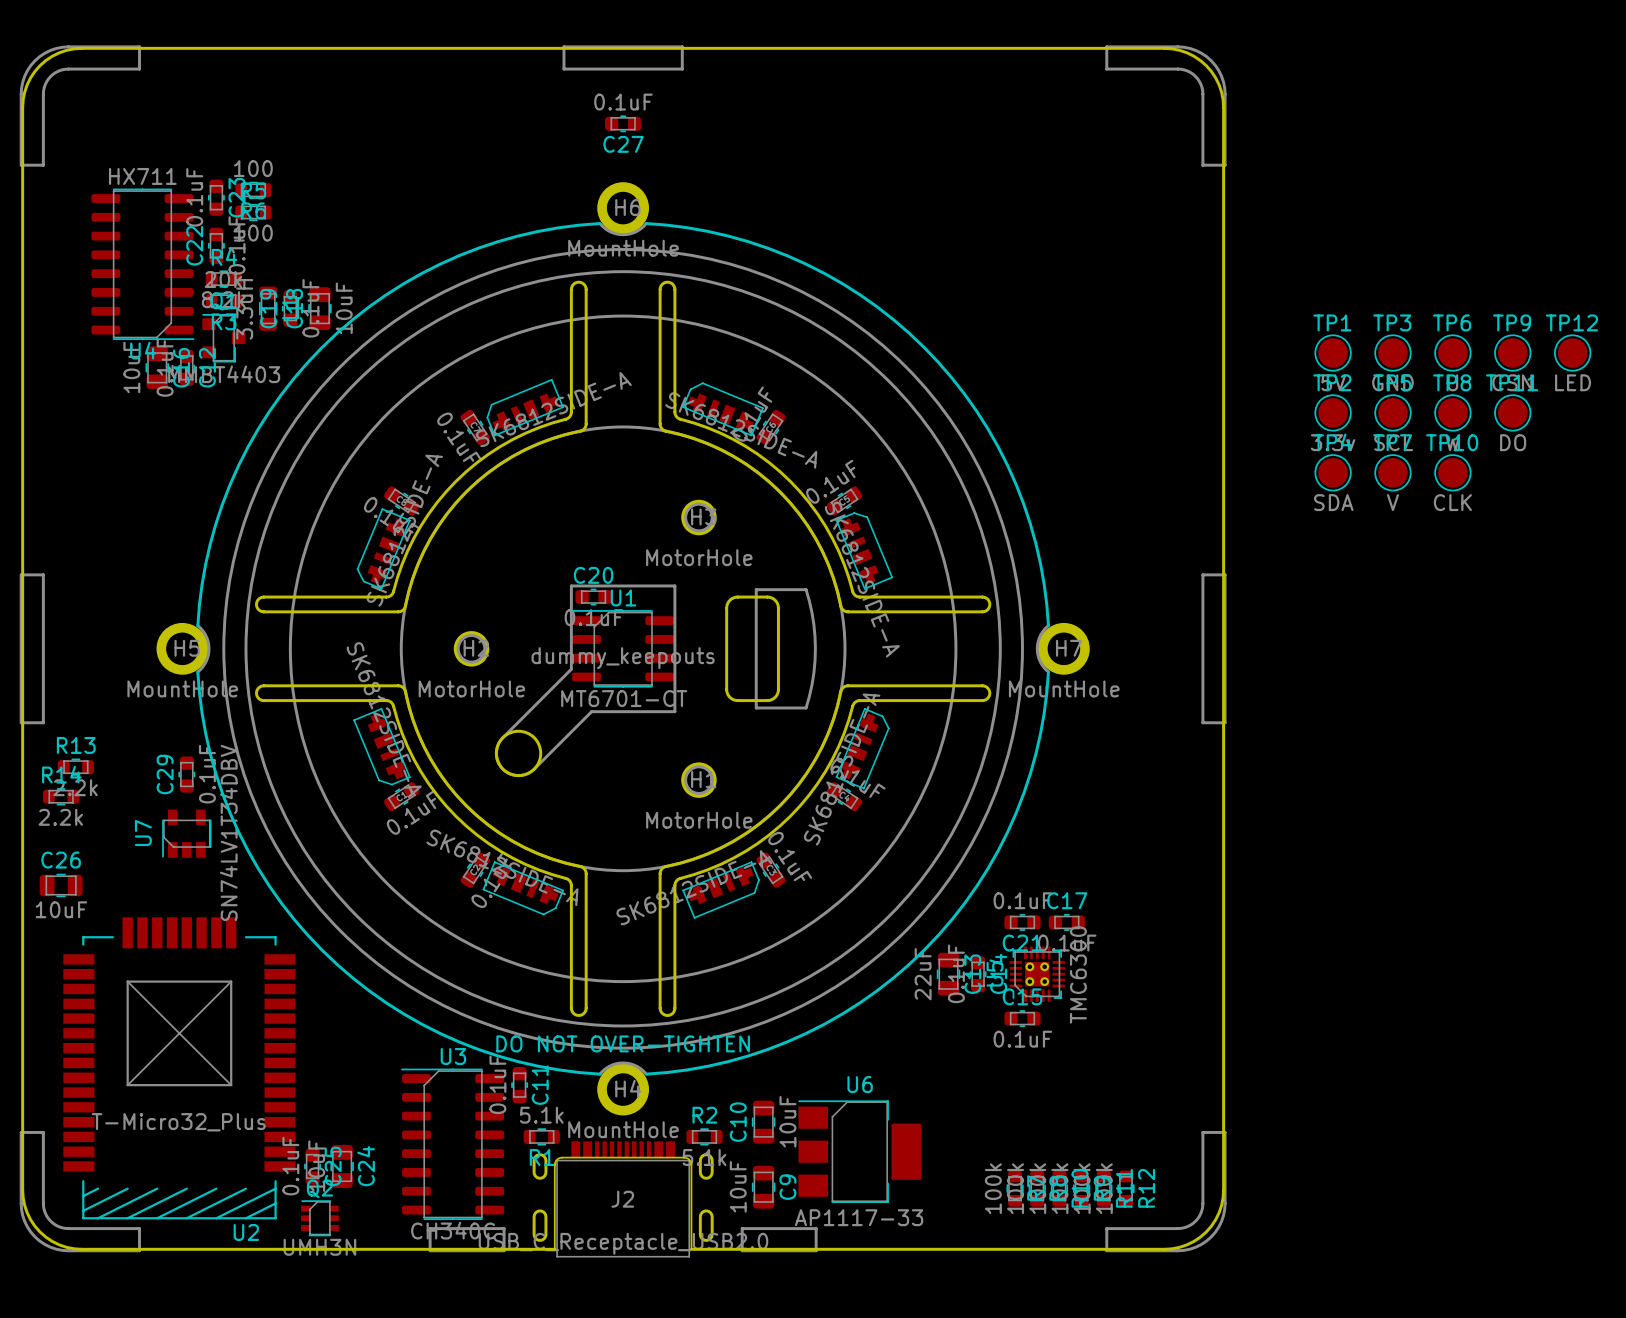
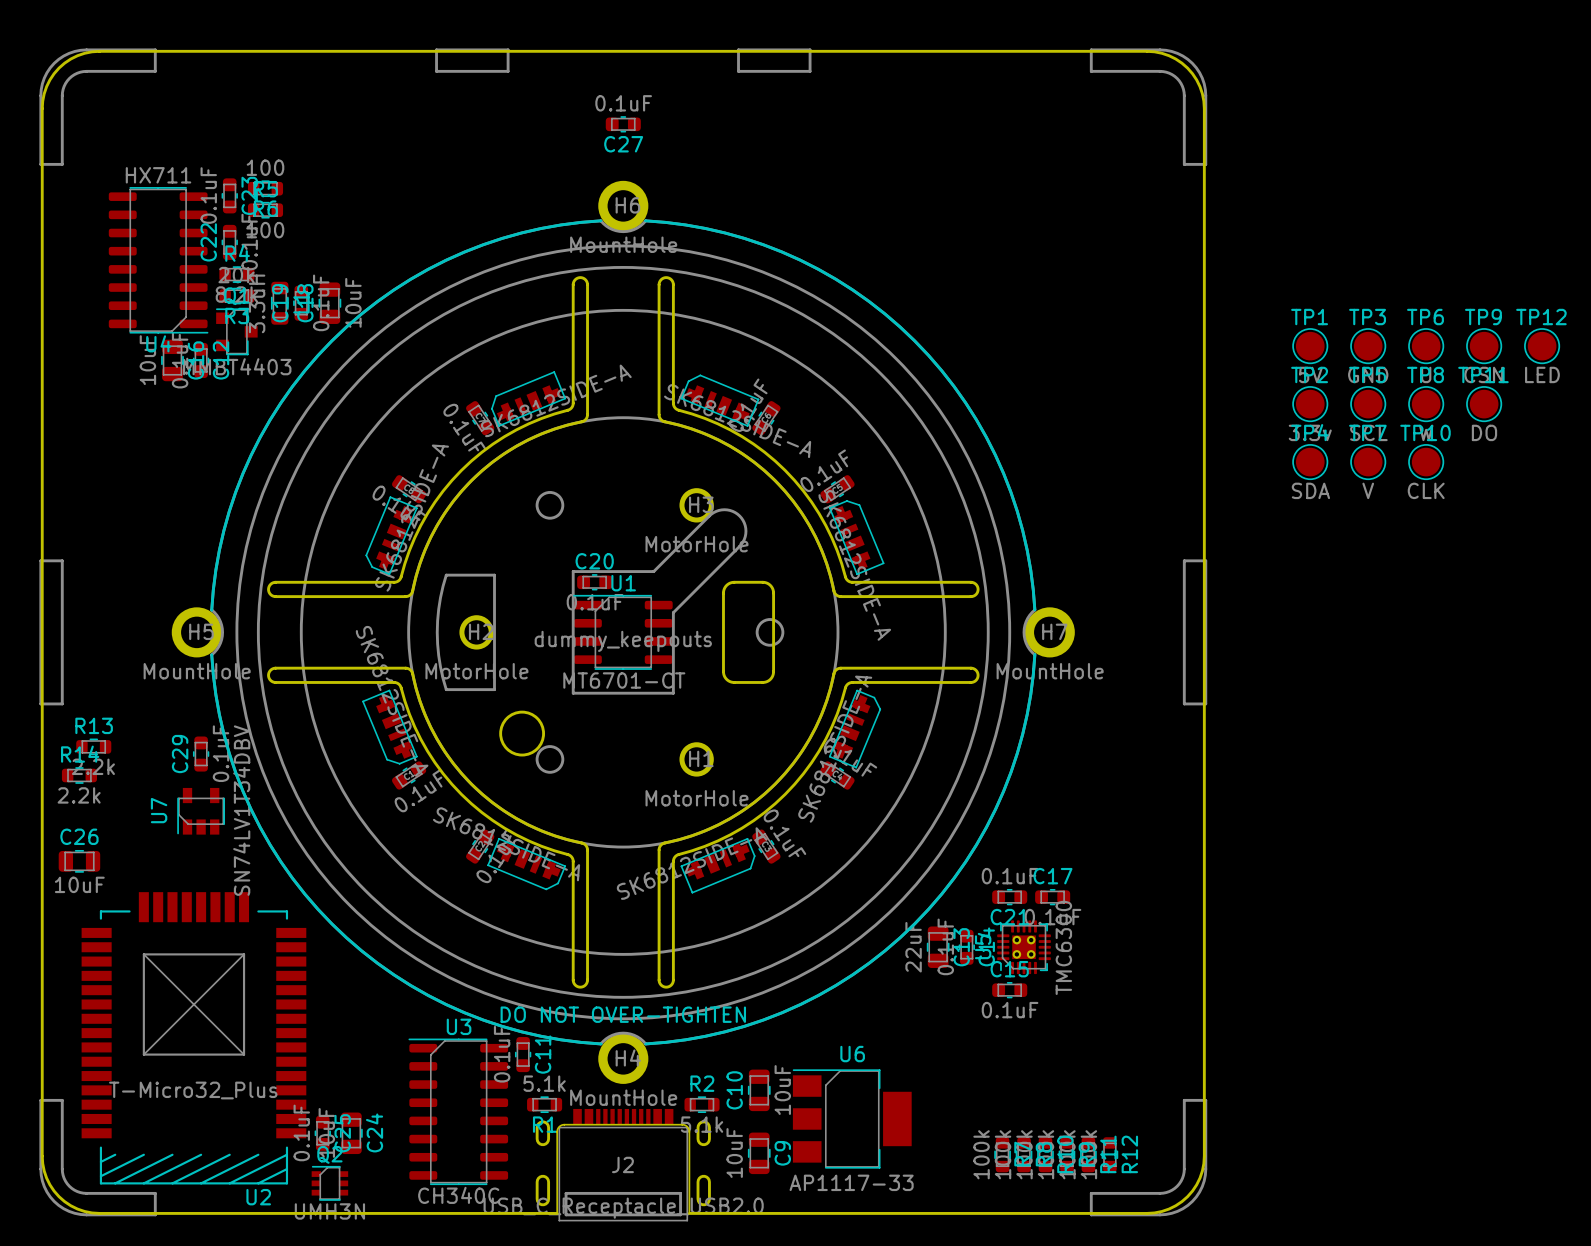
drawing: none -> [39, 48, 1208, 1217]
line: (563, 46) (682, 46) (682, 69) (563, 69) (563, 46) -> none
drawing: [222, 248, 1024, 1050] -> none
line: (571, 585) (674, 585) (674, 711) (591, 711) (532, 771) (524, 774) (512, 774) (505, 771) (498, 761) (496, 753) (499, 742) (571, 669) (571, 585) -> none
line: (756, 589) (806, 589) (813, 624) (815, 648) (812, 684) (806, 707) (756, 707) (756, 589) -> none
line: (430, 1228) (504, 1228) (504, 1250) (430, 1250) (430, 1228) -> none
line: (742, 1228) (816, 1228) (816, 1250) (742, 1250) (742, 1228) -> none

